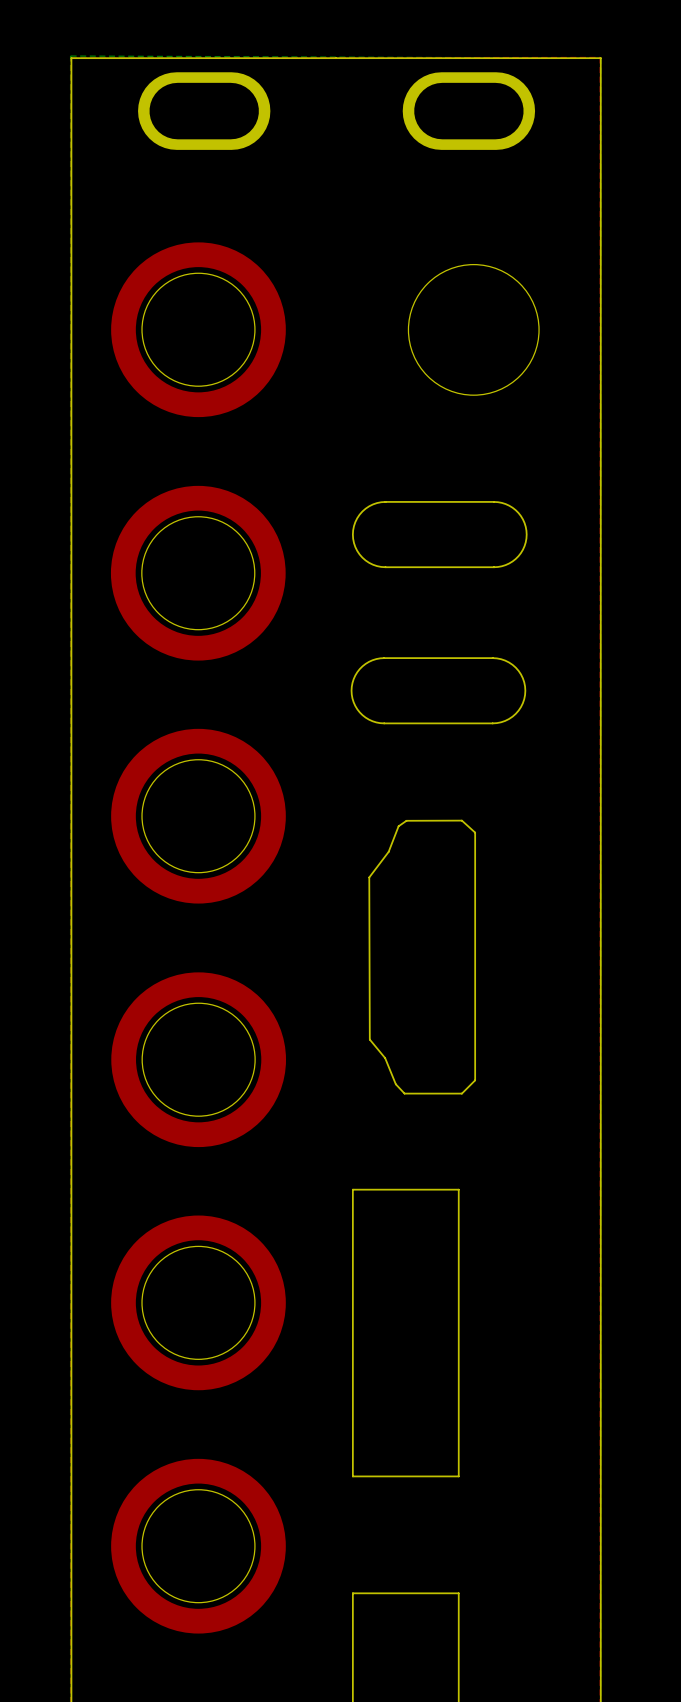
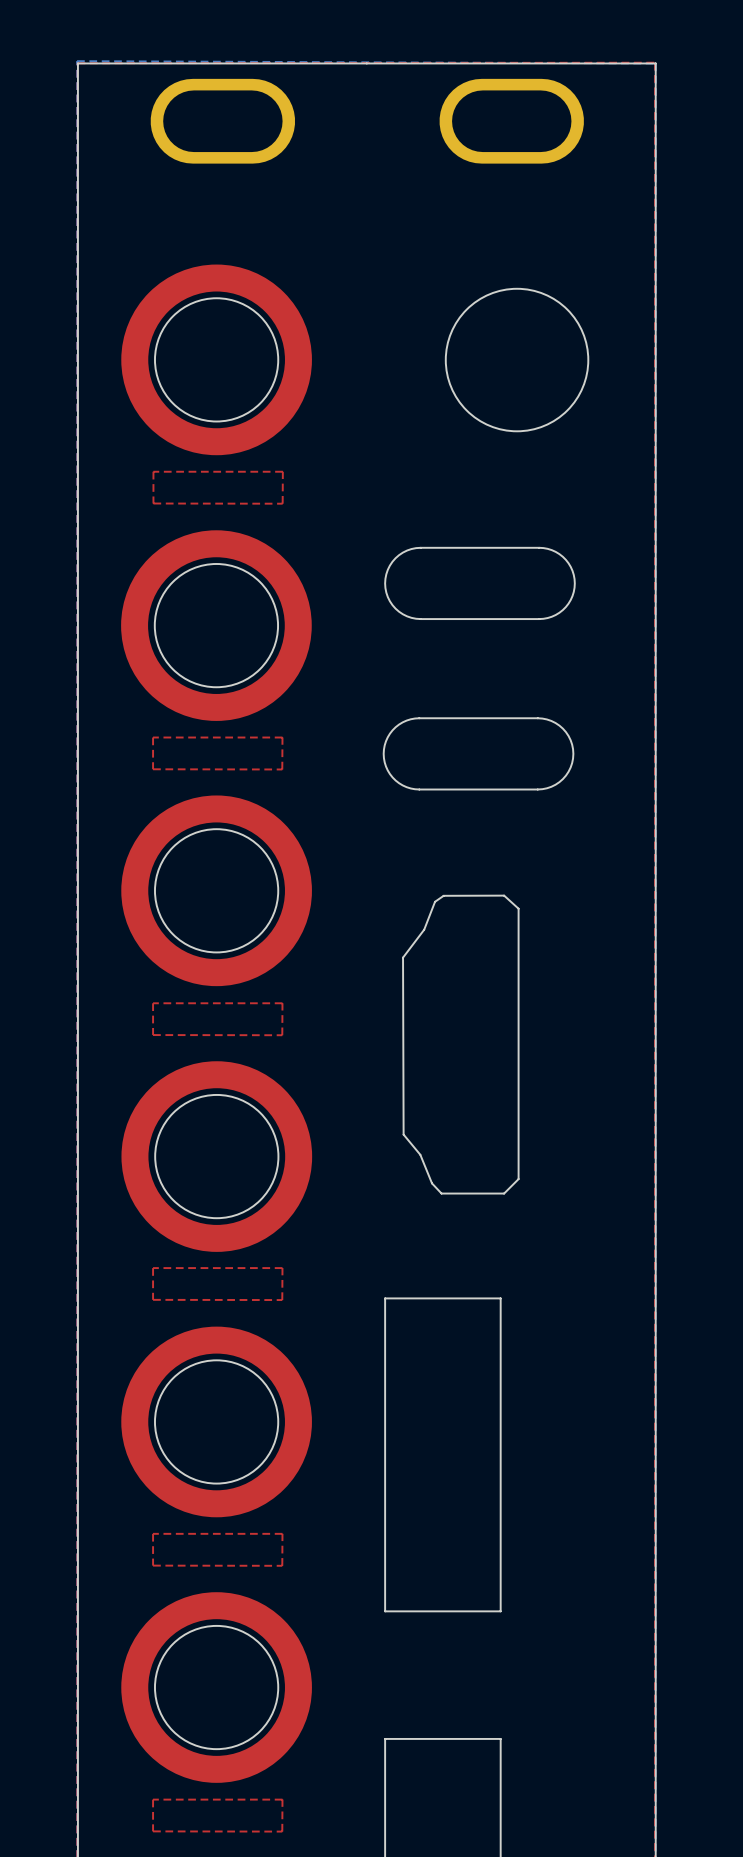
top zone outline: none -> (153, 471) (153, 503) (282, 503) (282, 471) (153, 471)
top zone outline: none -> (153, 737) (153, 769) (282, 769) (282, 737) (153, 737)
top zone outline: none -> (153, 1003) (153, 1035) (282, 1035) (282, 1003) (153, 1003)
top zone outline: none -> (153, 1268) (153, 1299) (282, 1300) (282, 1268) (153, 1268)
top zone outline: none -> (153, 1533) (153, 1565) (282, 1565) (282, 1533) (153, 1533)
top zone outline: none -> (153, 1799) (153, 1831) (282, 1831) (282, 1799) (153, 1799)

